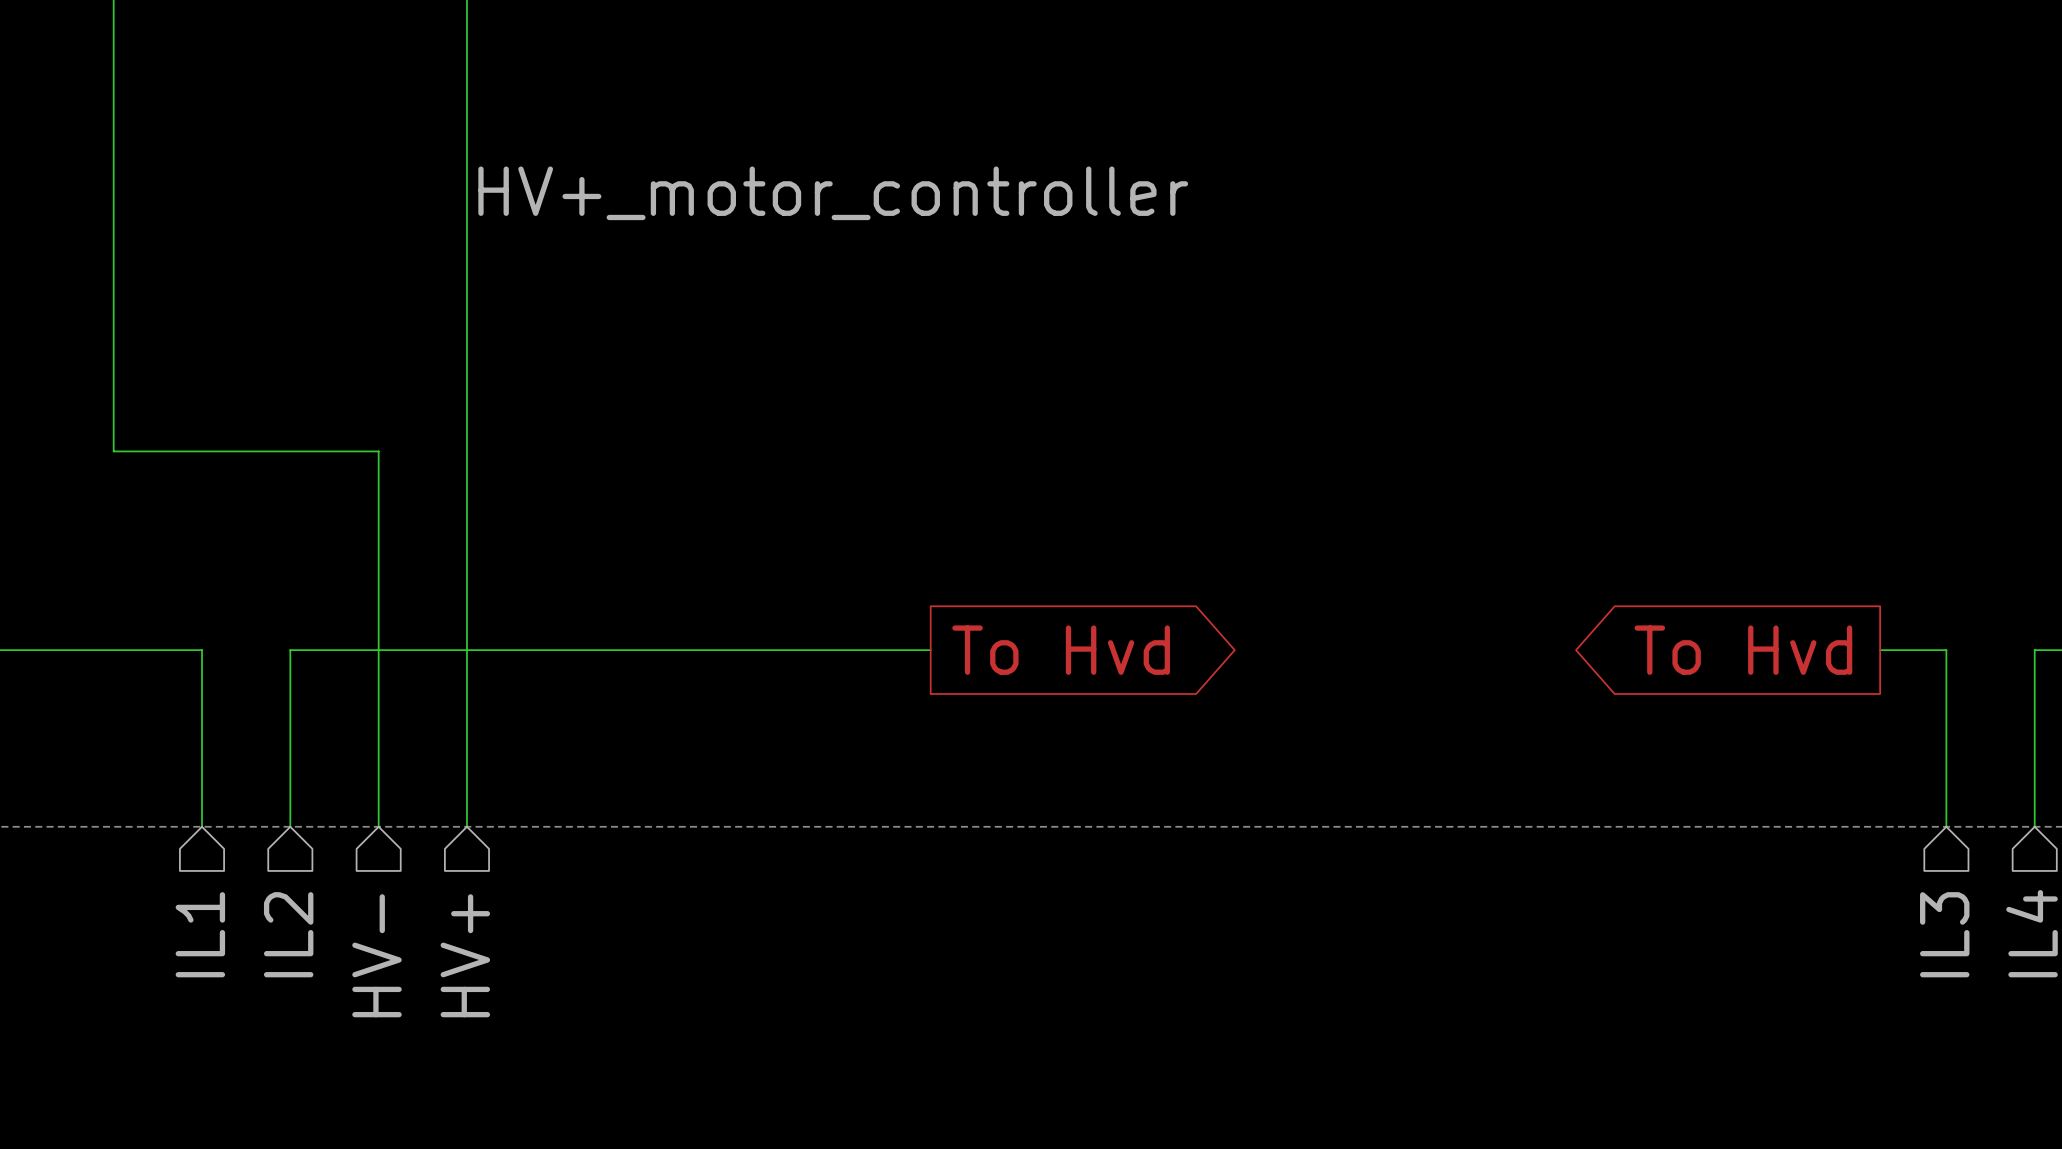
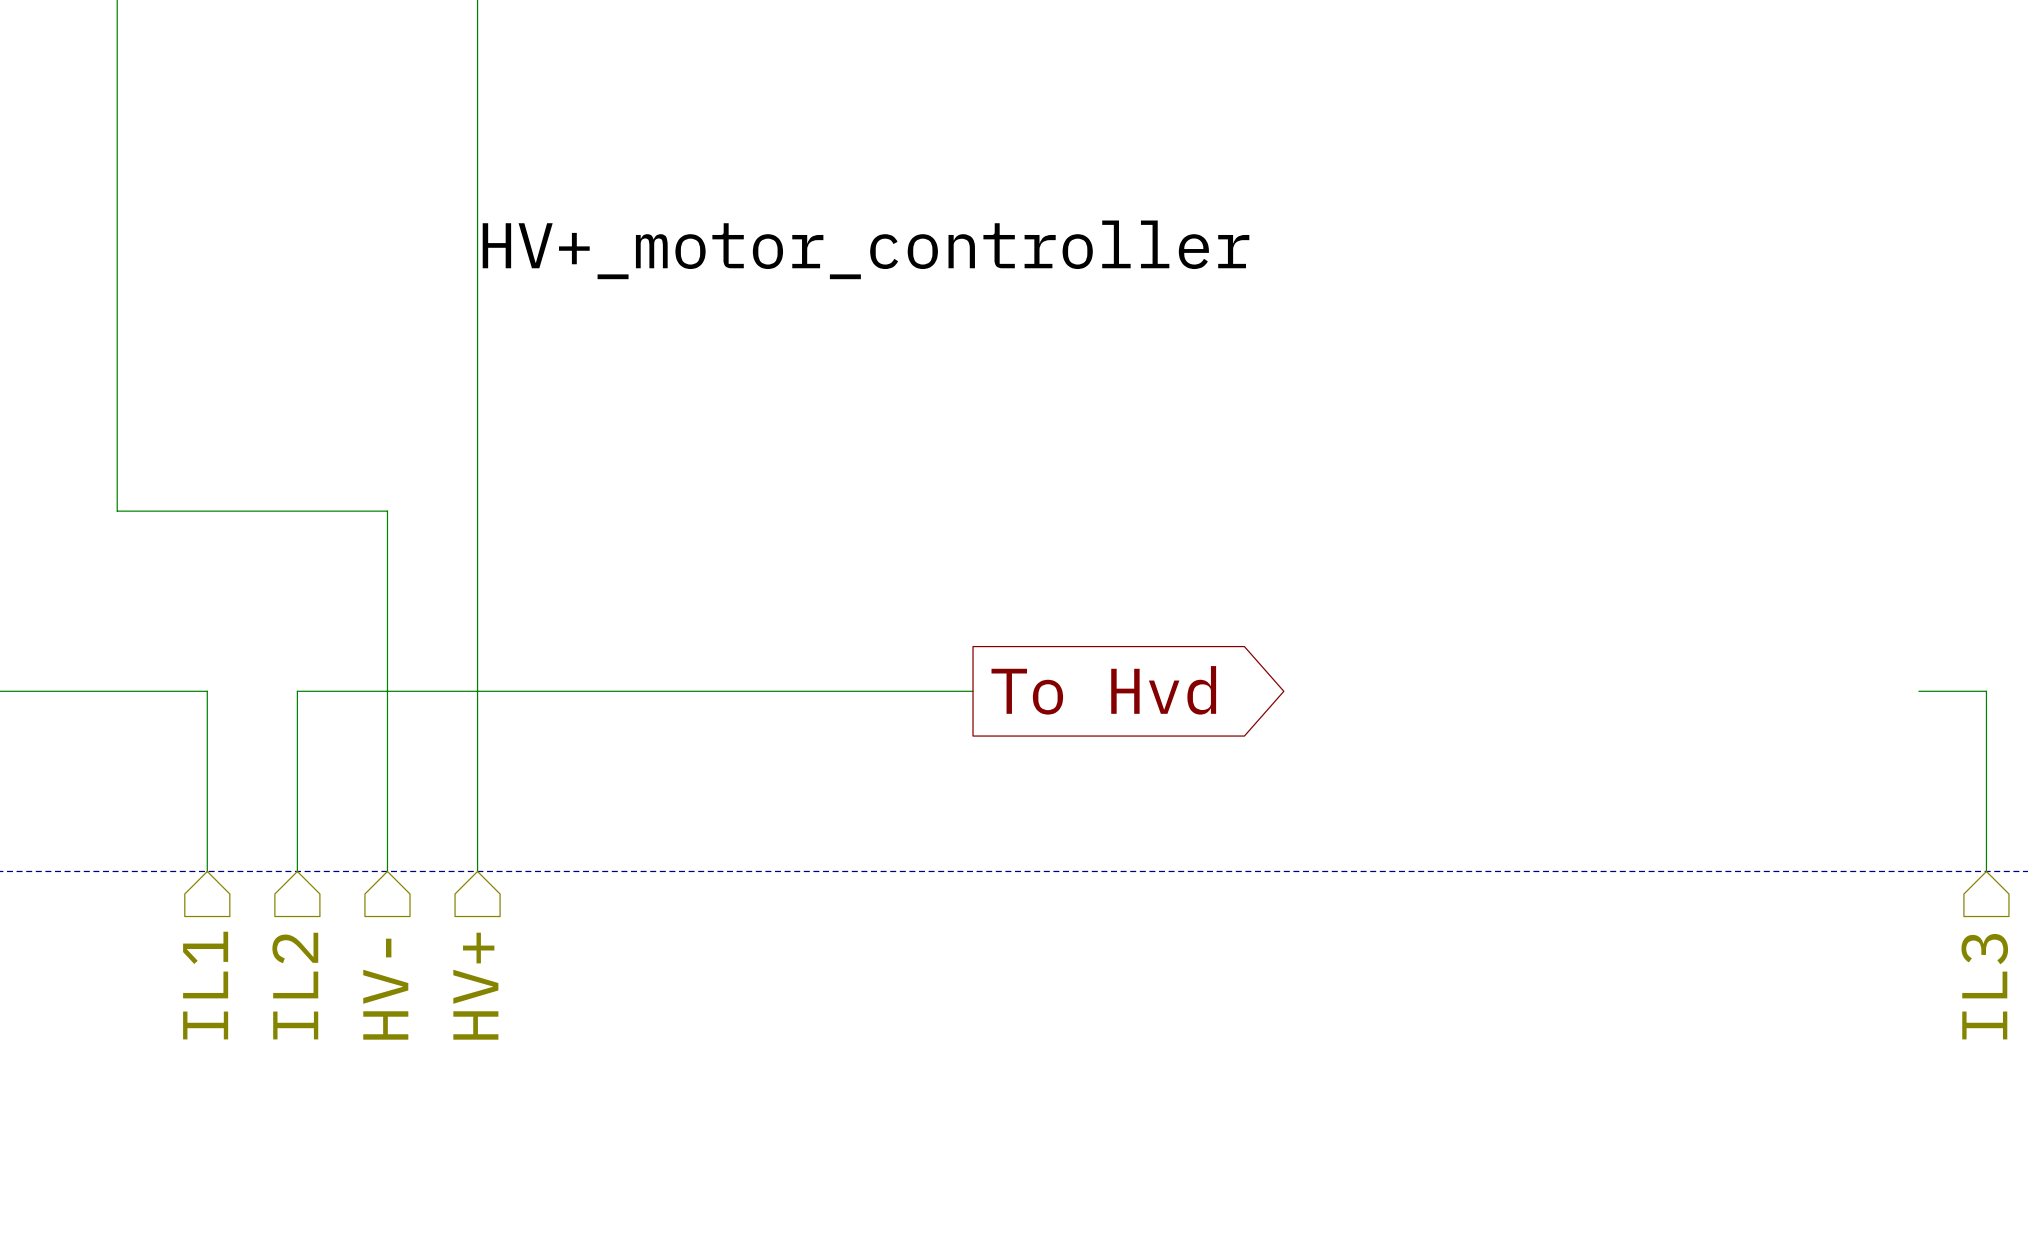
label position: HV+_motor_controller (833, 193) -> HV+_motor_controller (866, 249)
wire: (113, 451) (378, 451) (378, 473) -> (117, 488) (117, 511) (387, 511)
wire: none -> (950, 691) (973, 691)
global label position: To Hvd (1061, 650) -> To Hvd (1103, 690)
global label: To Hvd (1743, 650) -> none

